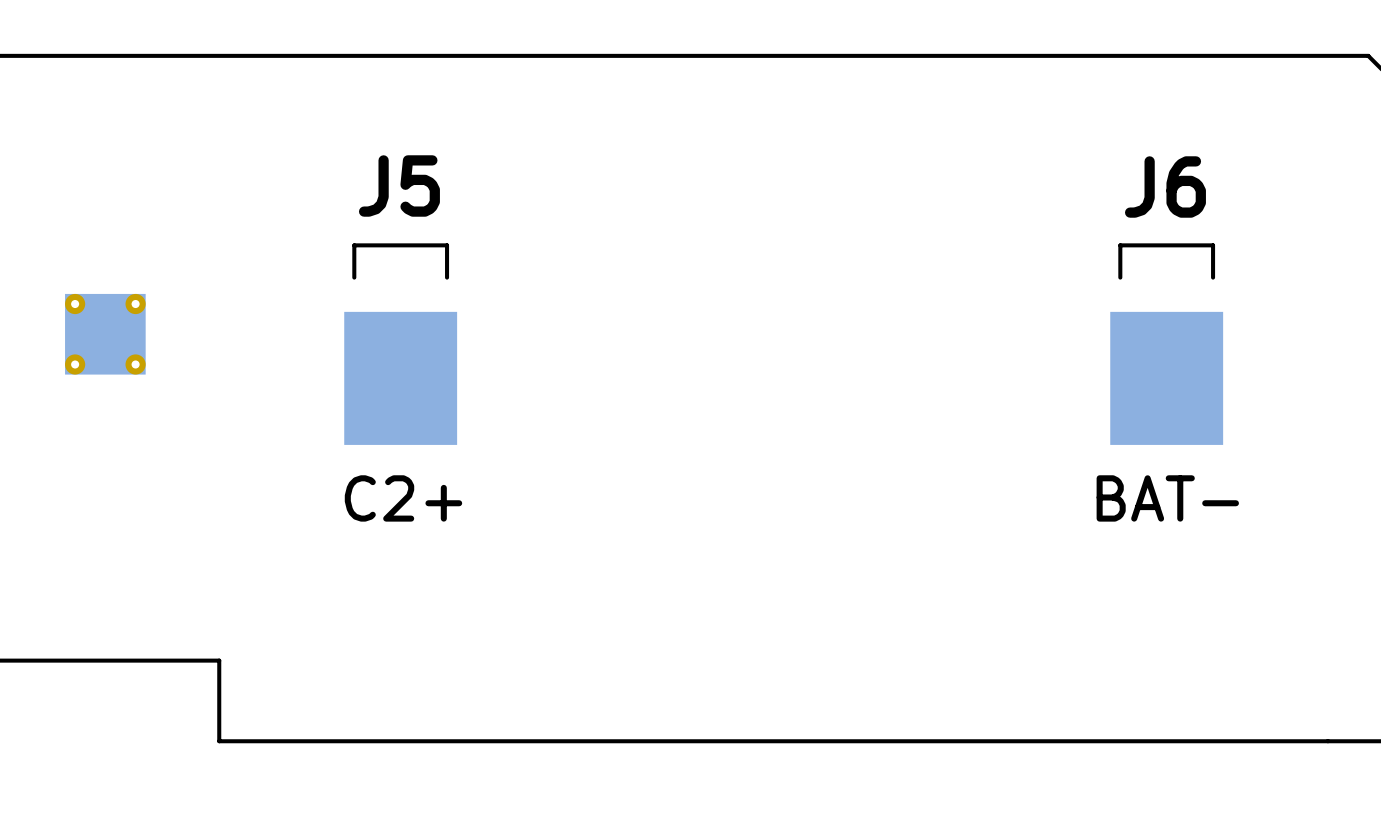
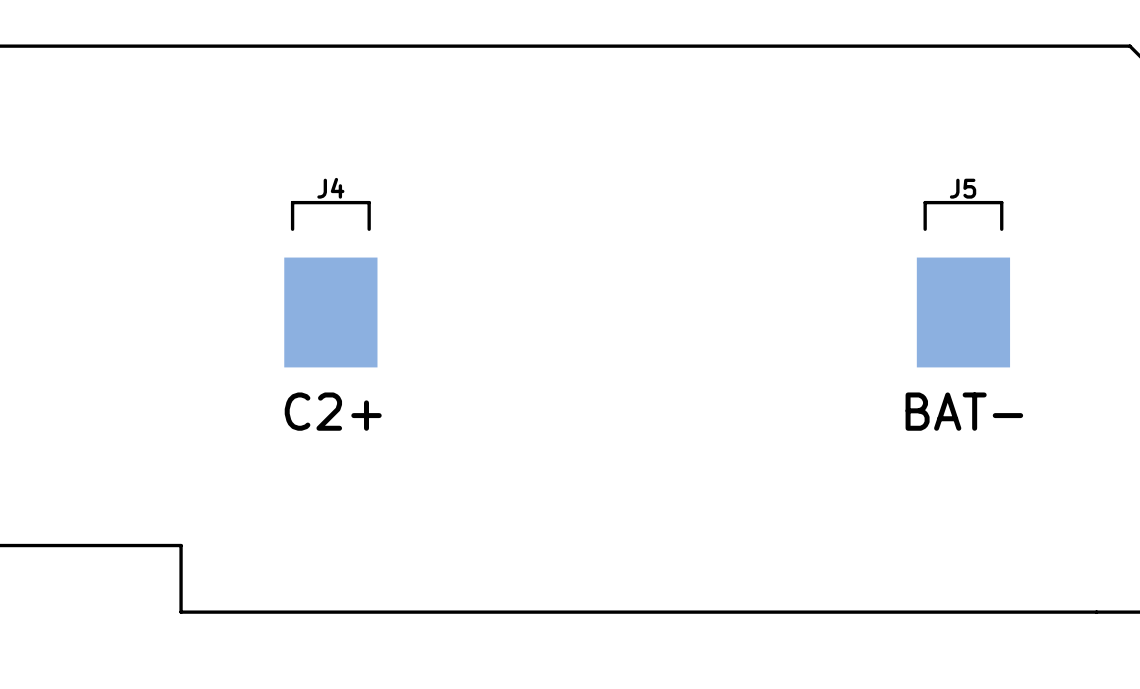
J5 name: J5 (399, 185) -> J4 (330, 188)
J6 name: J6 (1165, 187) -> J5 (963, 188)
part: (105, 334) -> none

